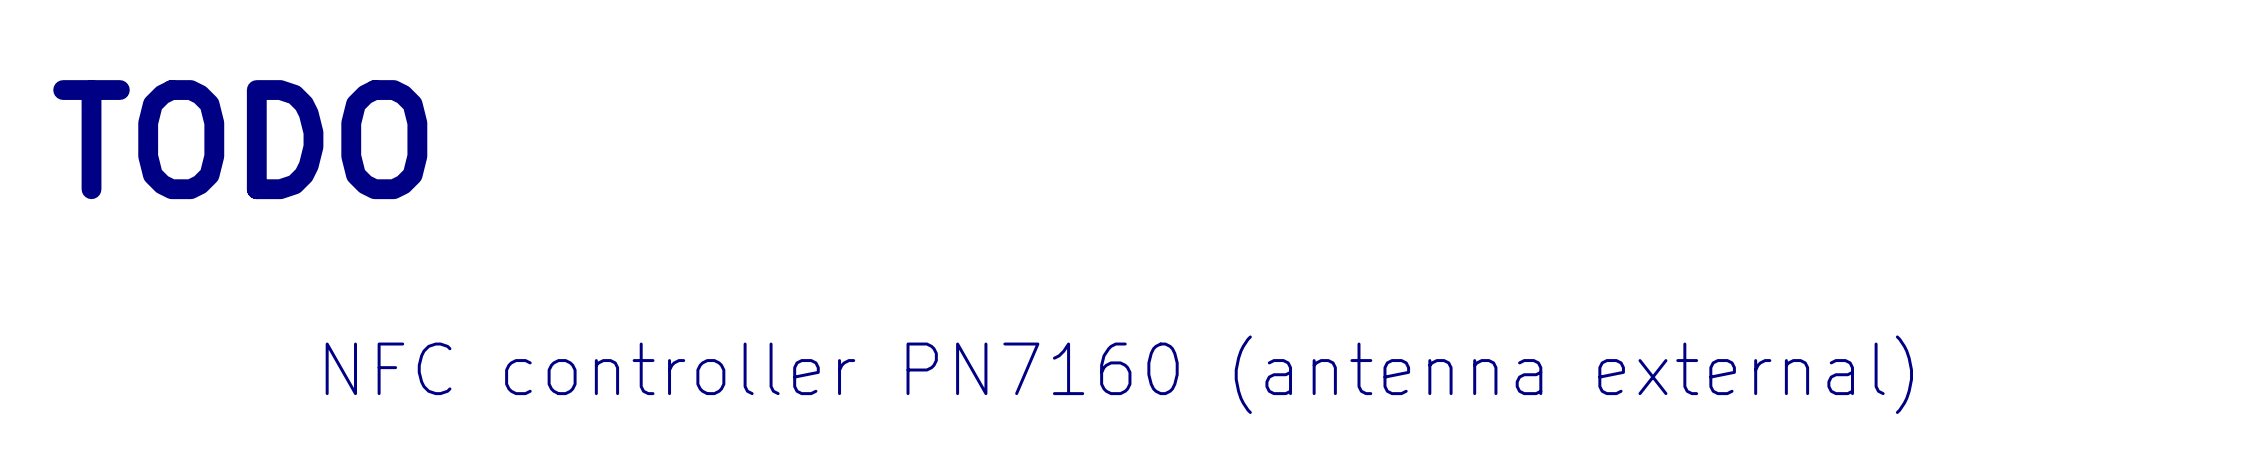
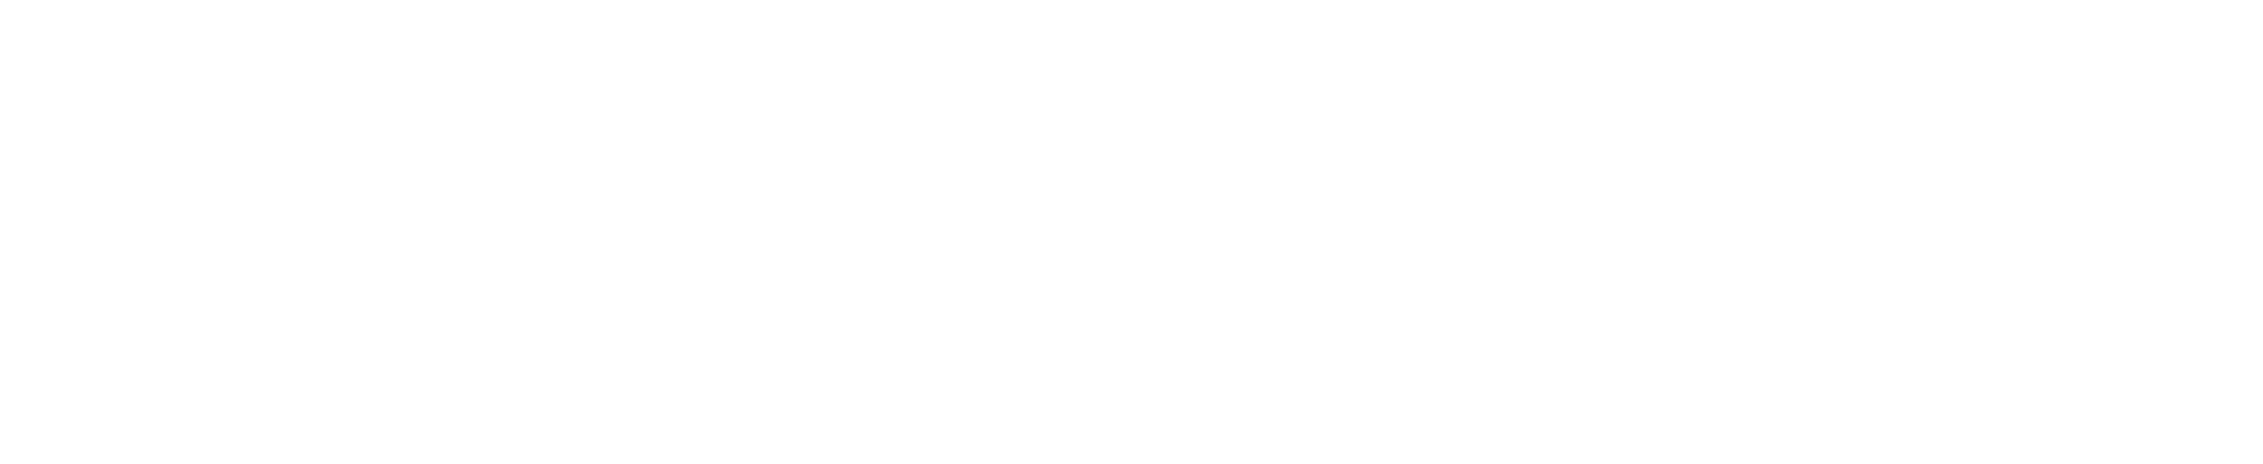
text: TODO (240, 139) -> none
text: NFC controller PN7160 (antenna external) (1119, 374) -> none

